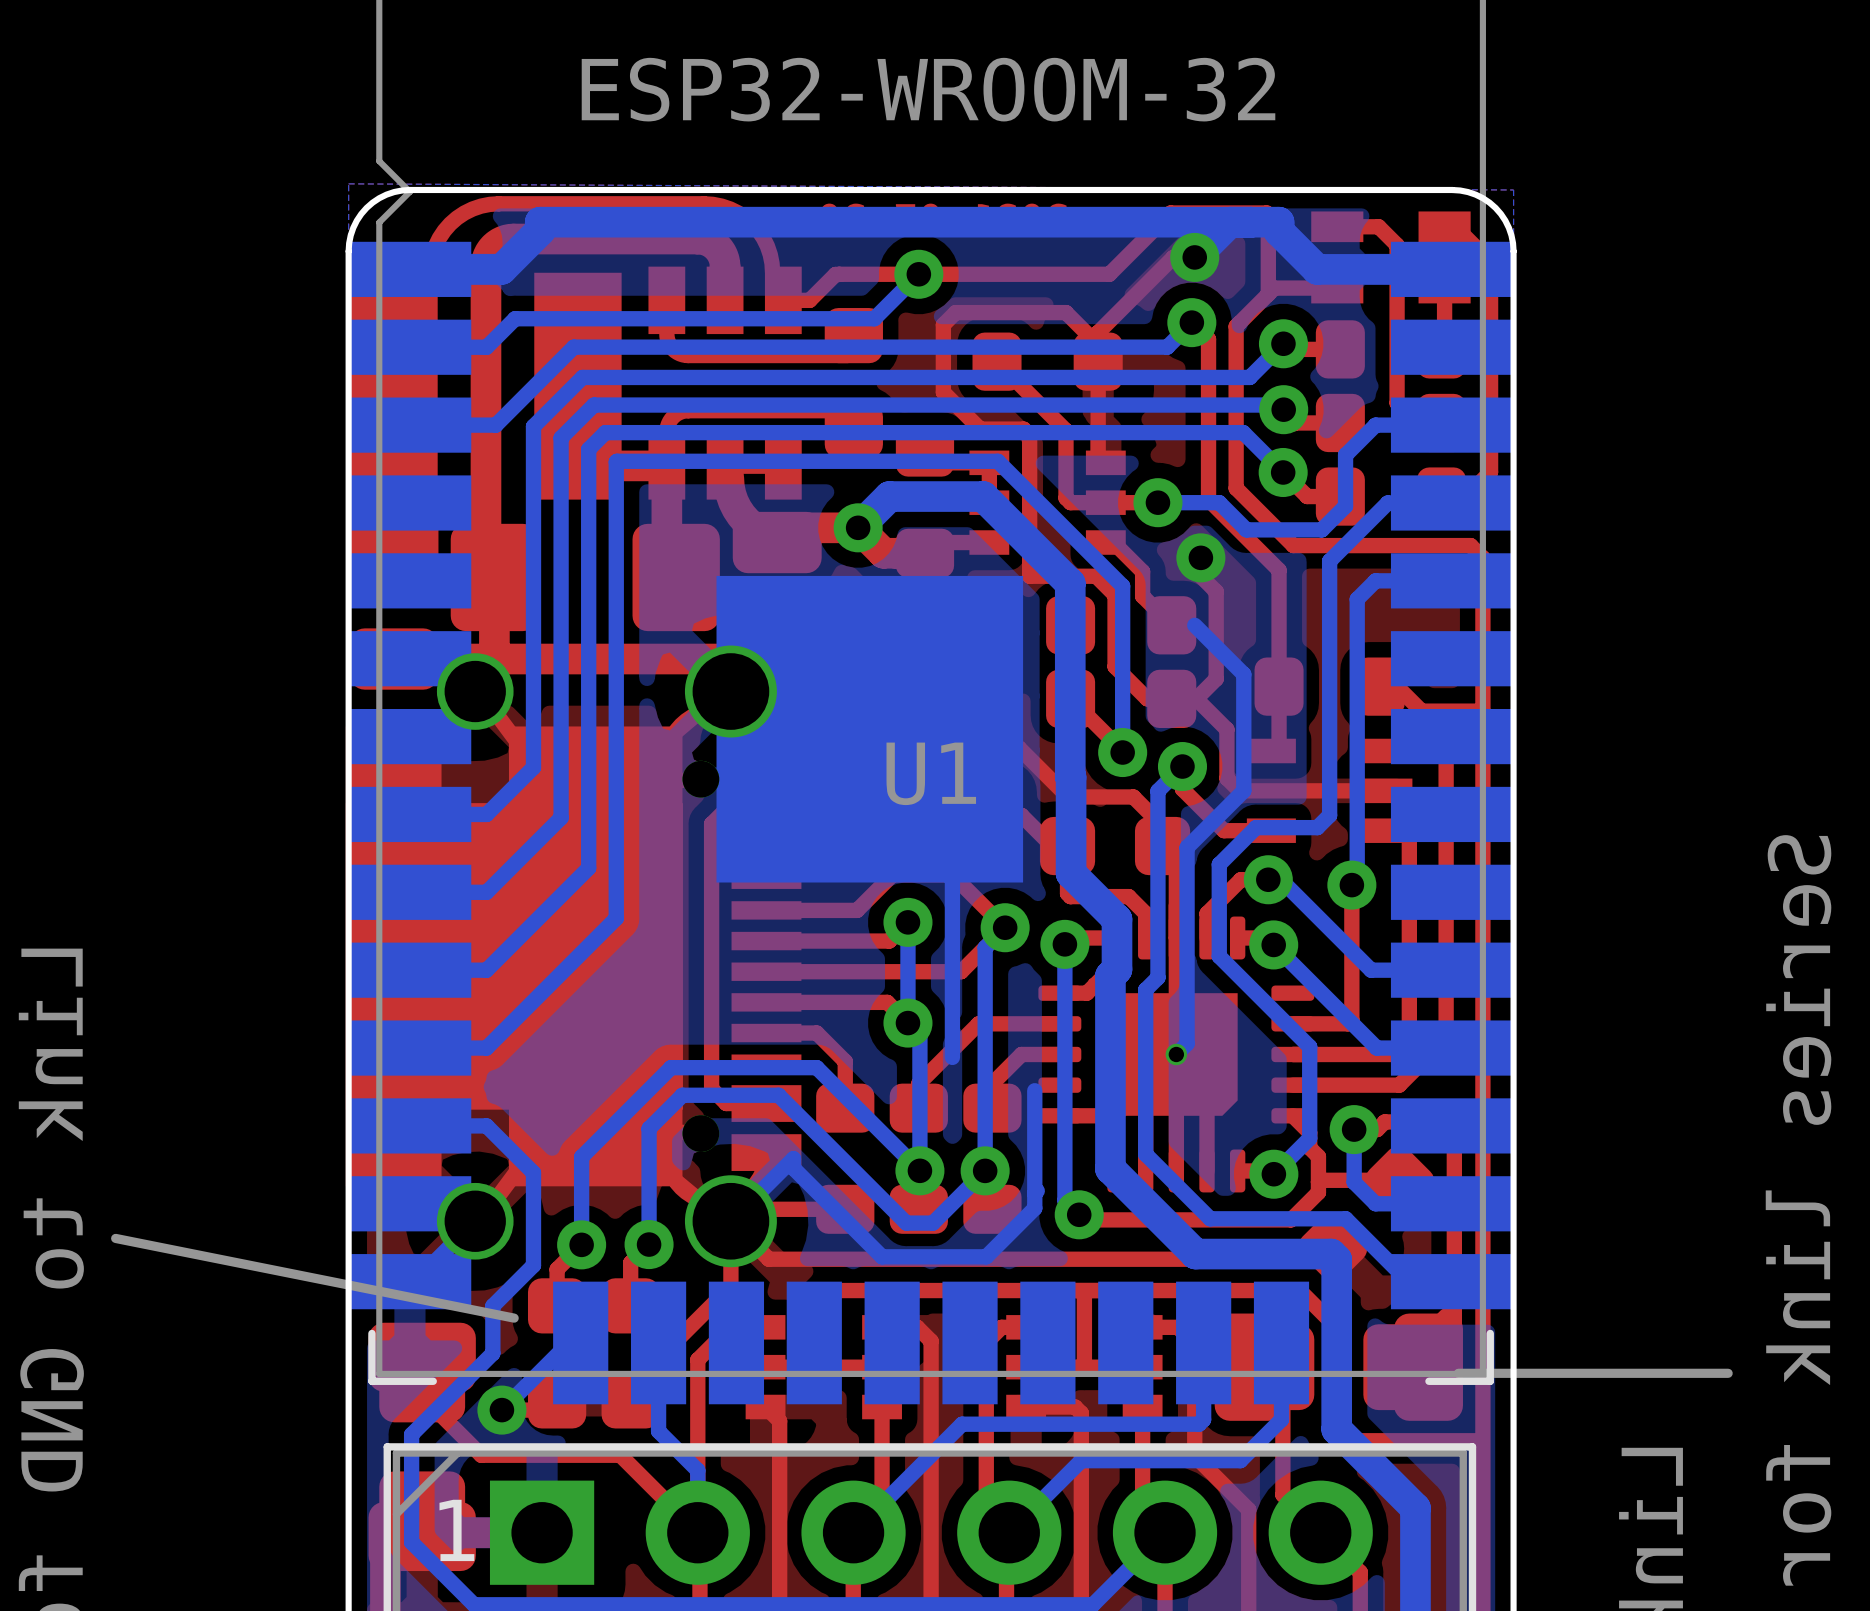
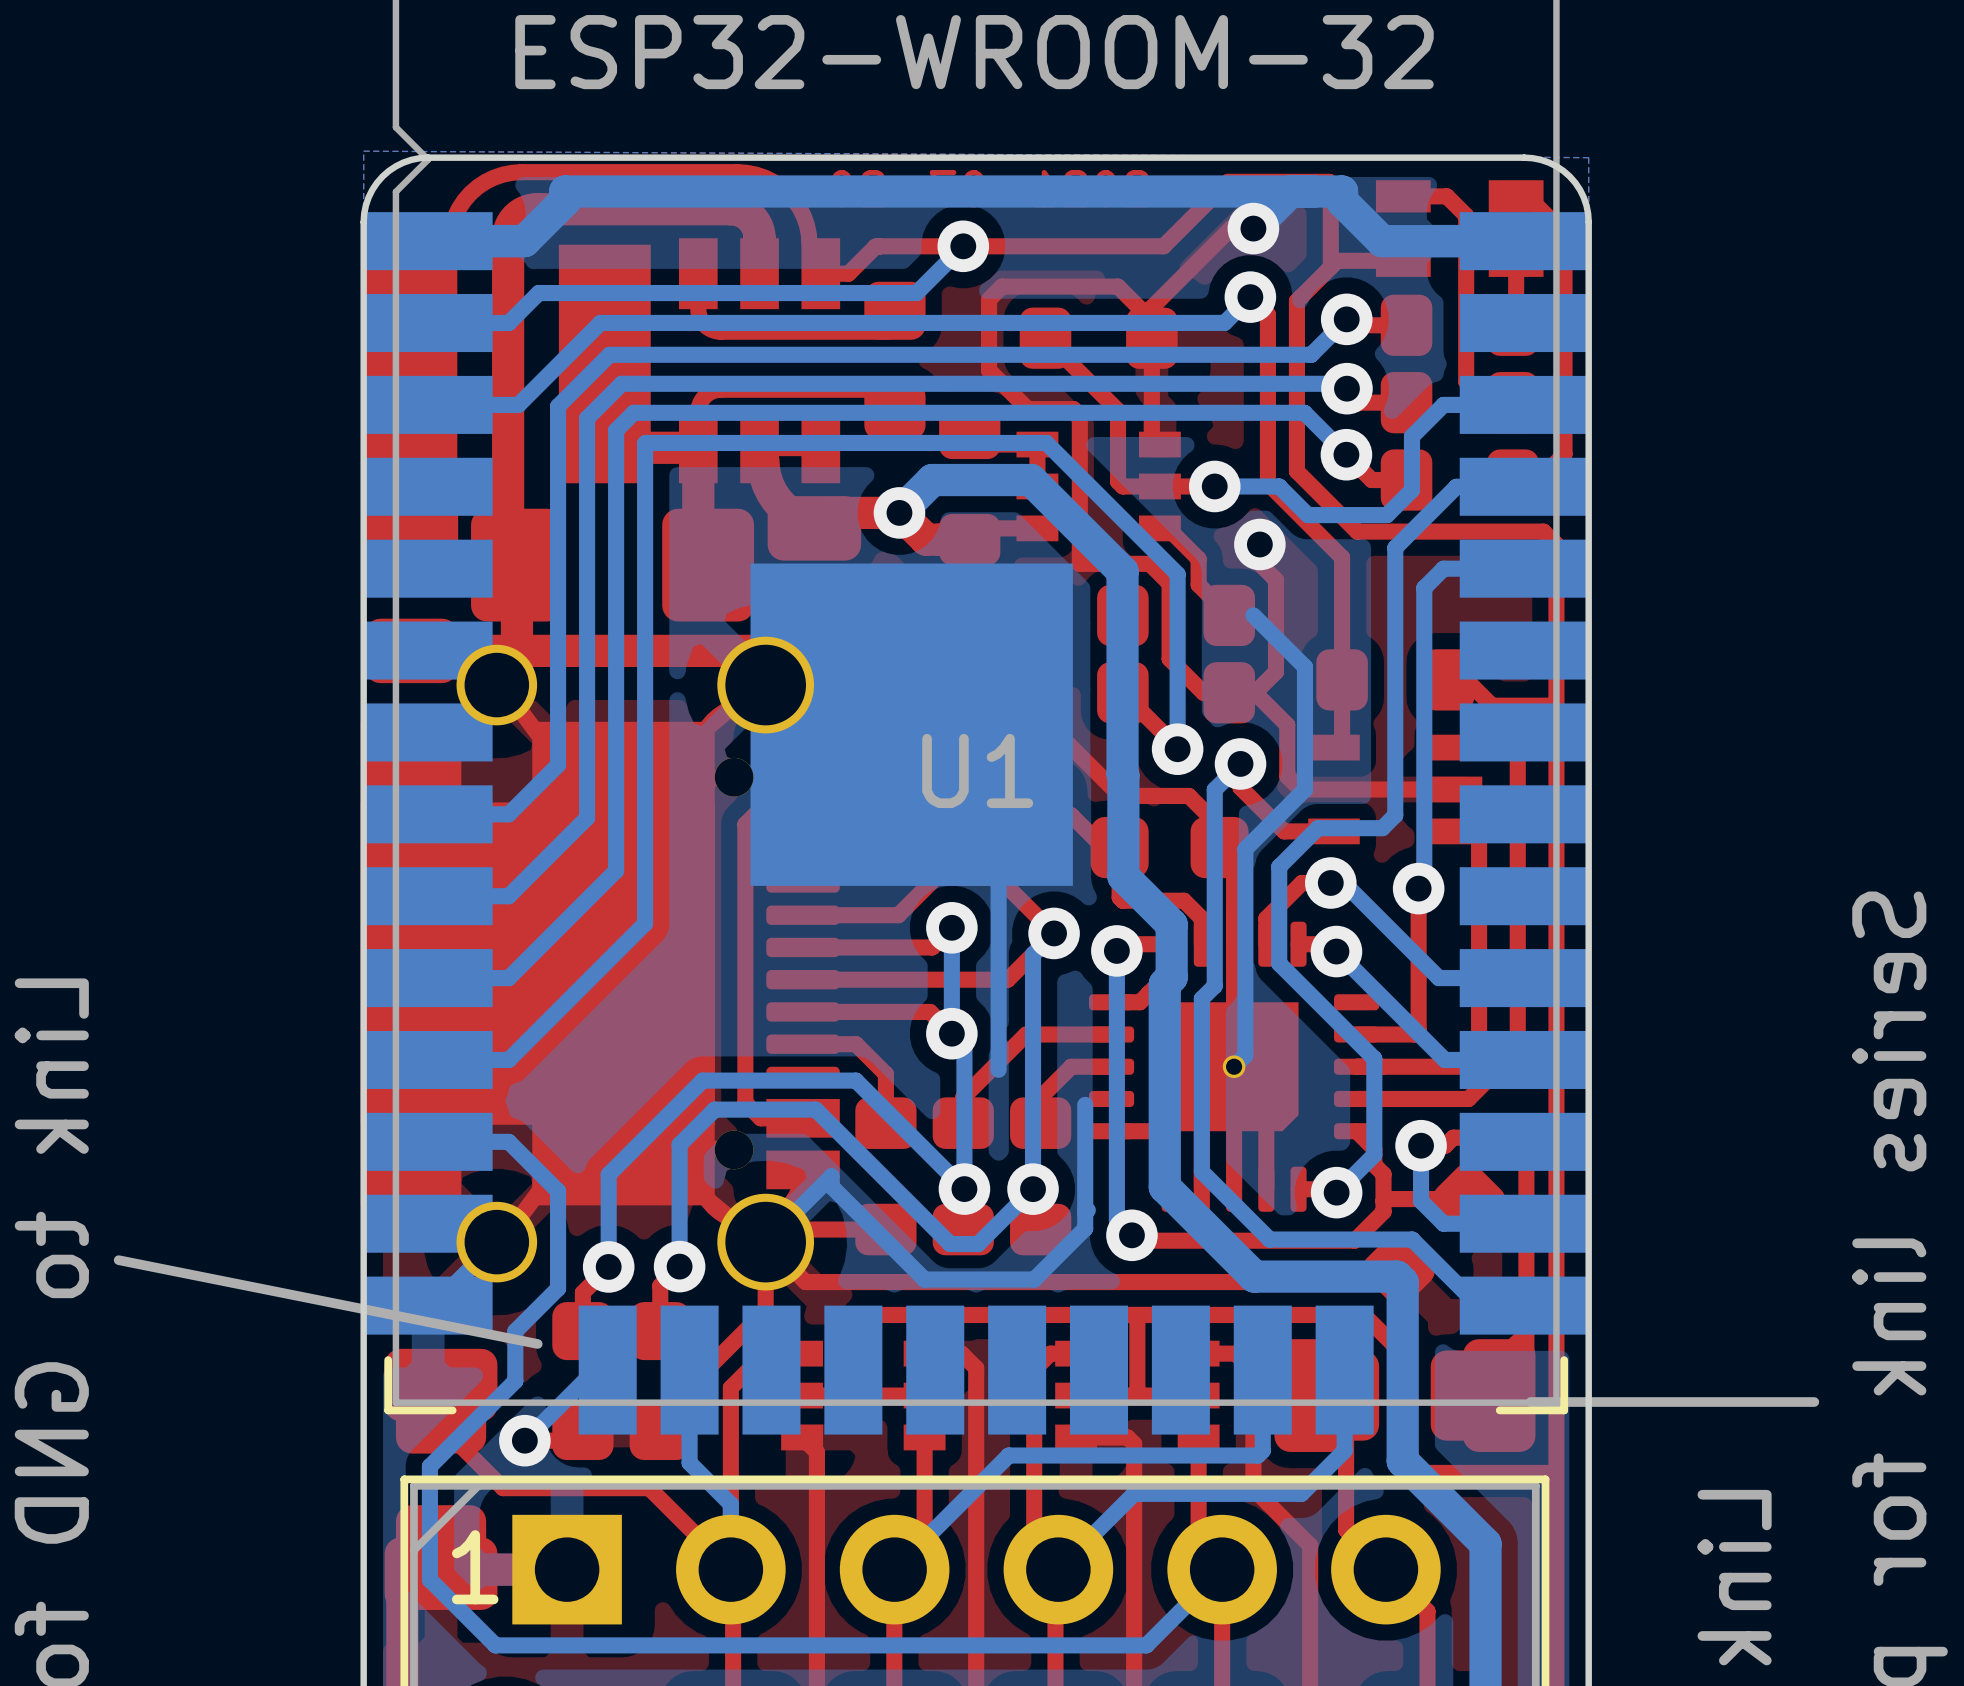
part footprint: [345, 645, 802, 1268] -> [360, 636, 840, 1291]

